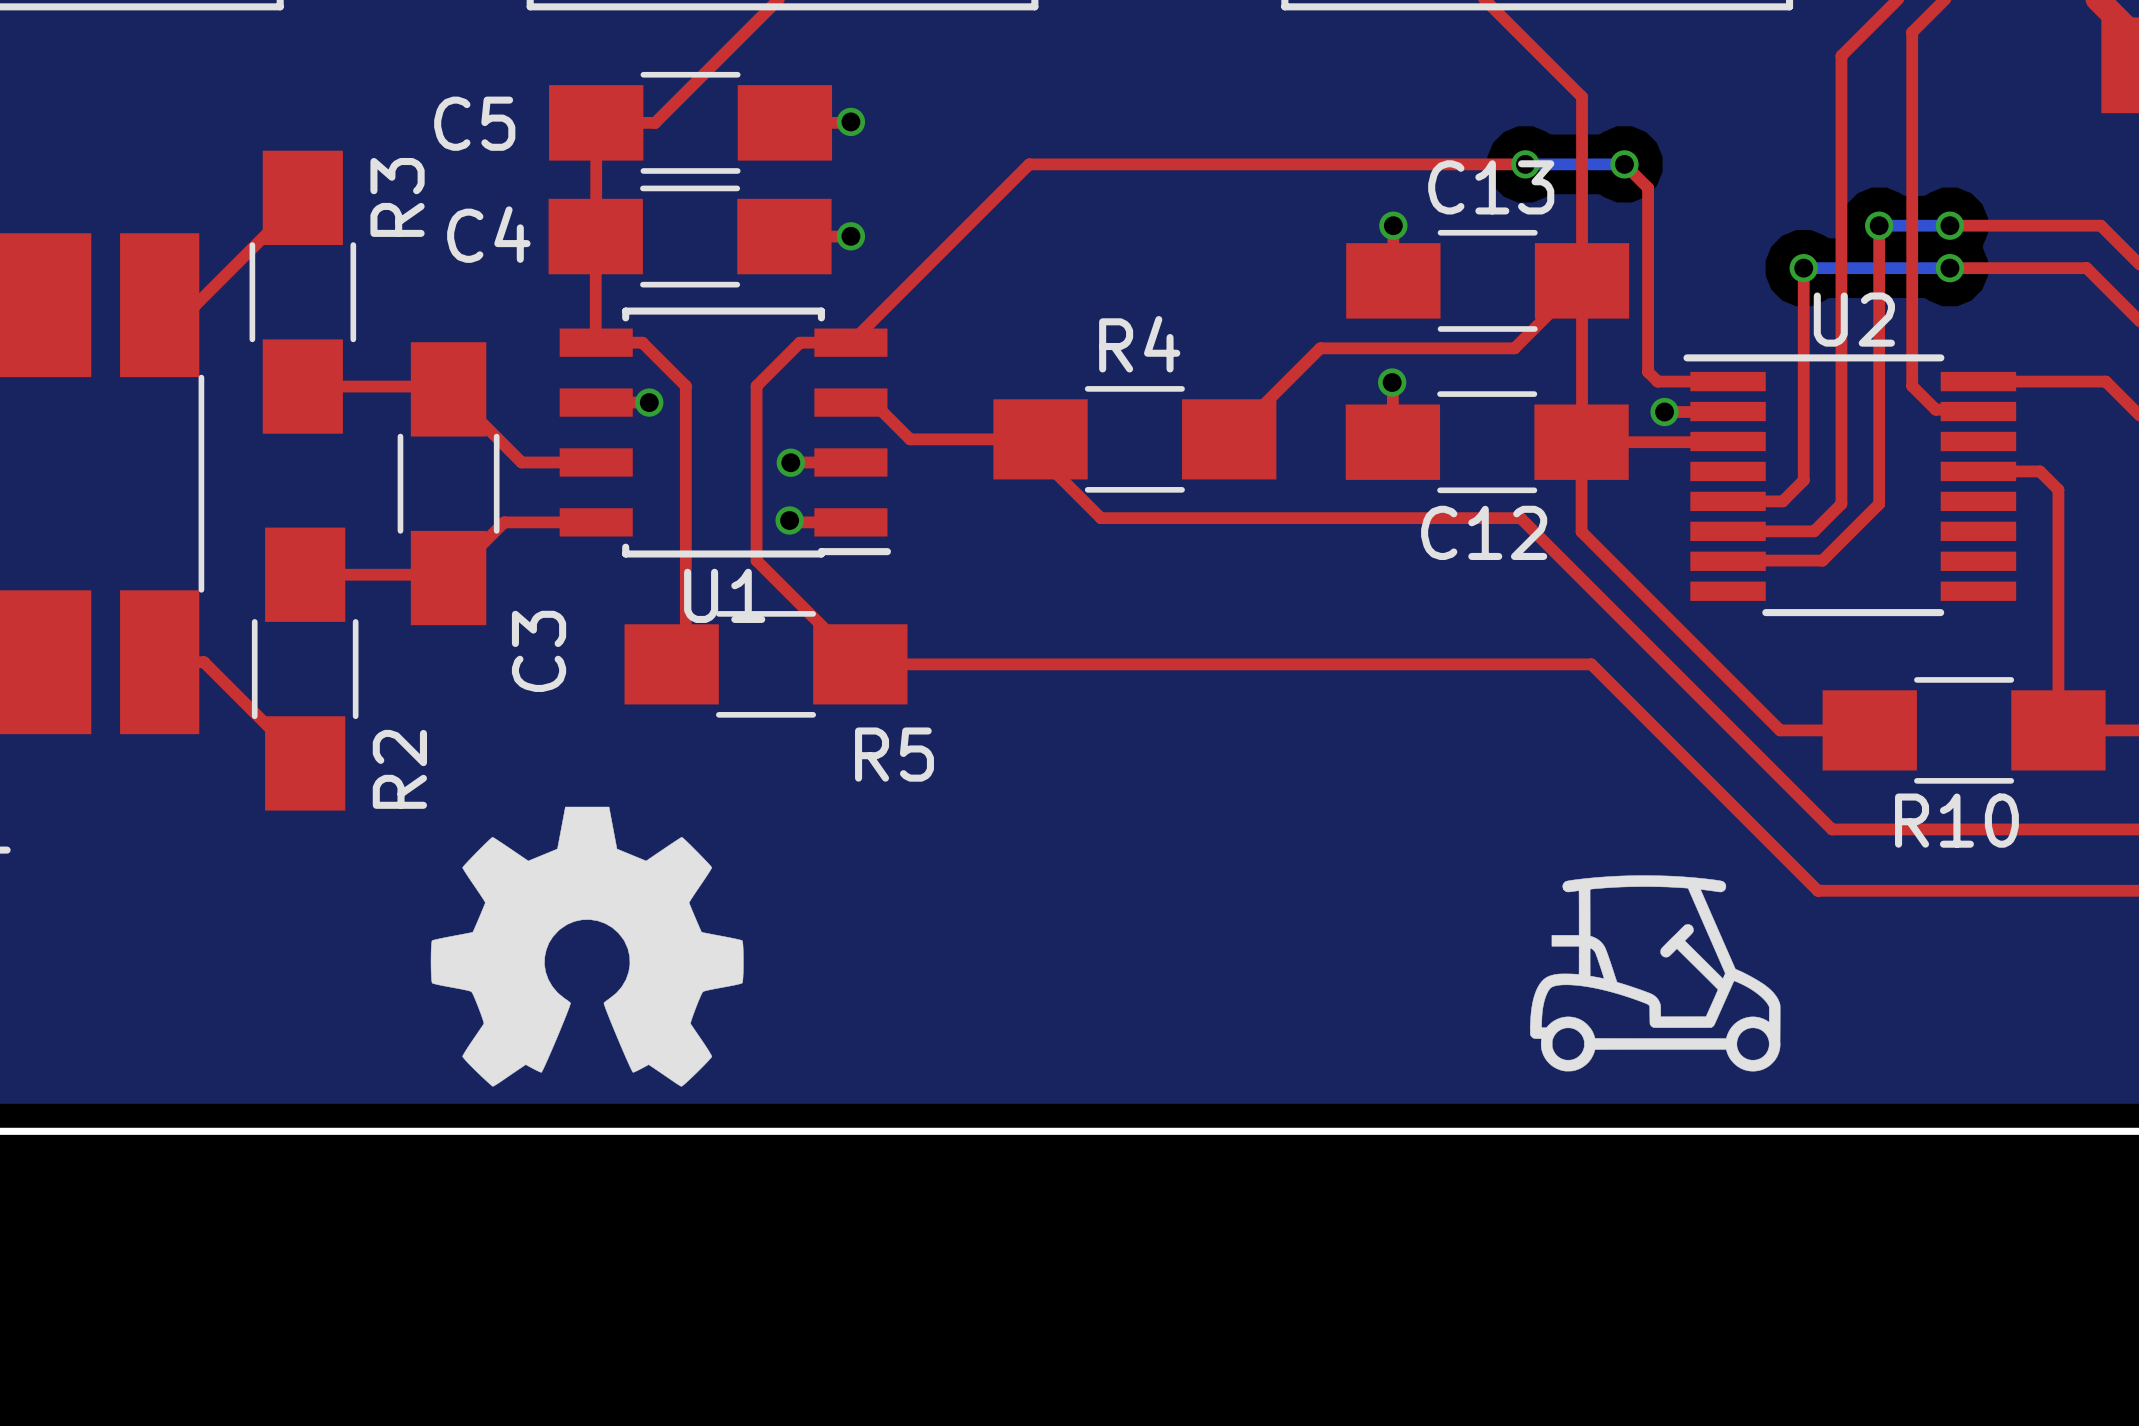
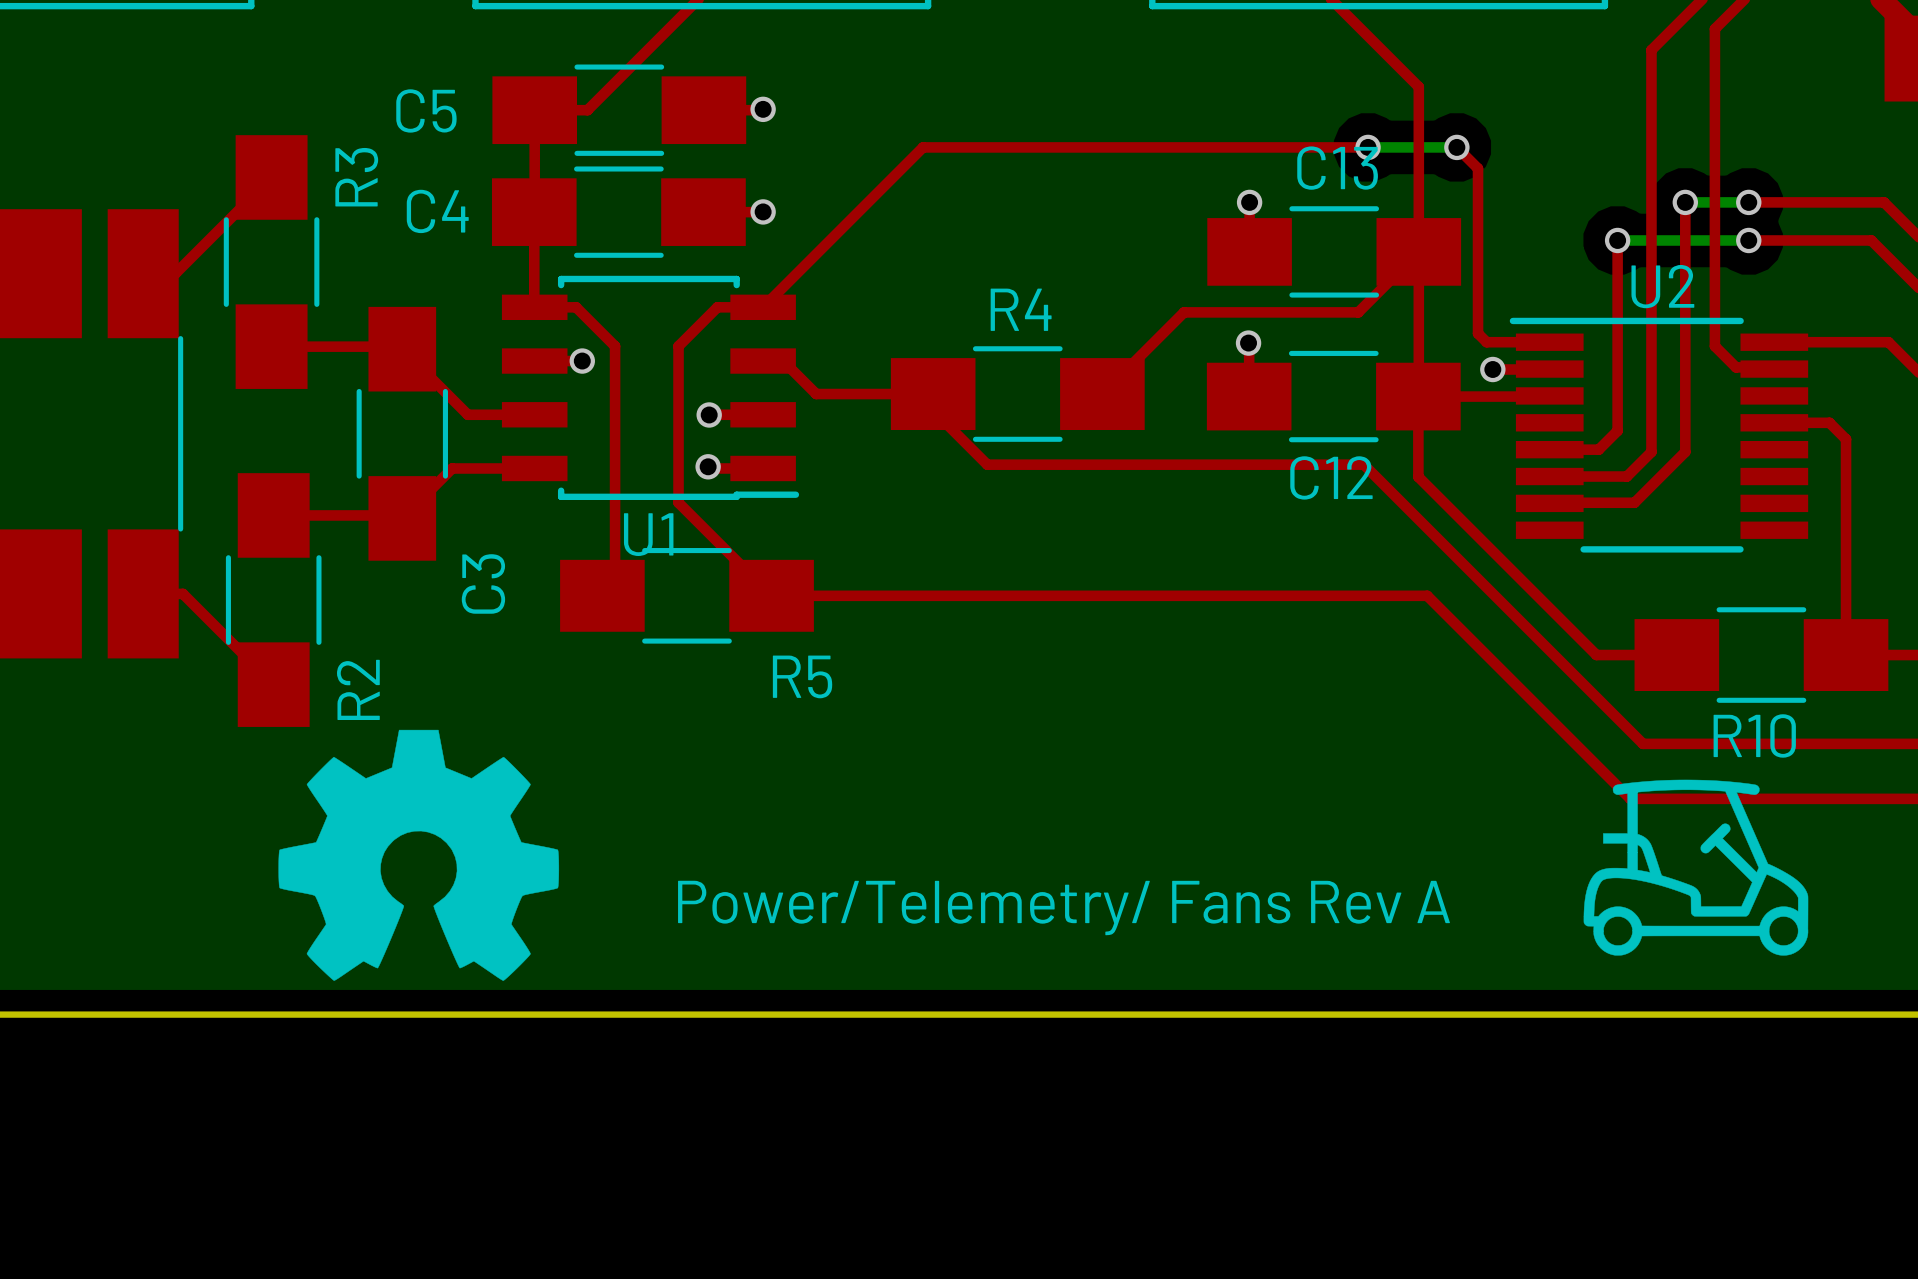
drawing position: (587, 946) -> (418, 855)
drawing position: (1655, 973) -> (1695, 867)
text: none -> Power/Telemetry/ Fans Rev A (1063, 907)

